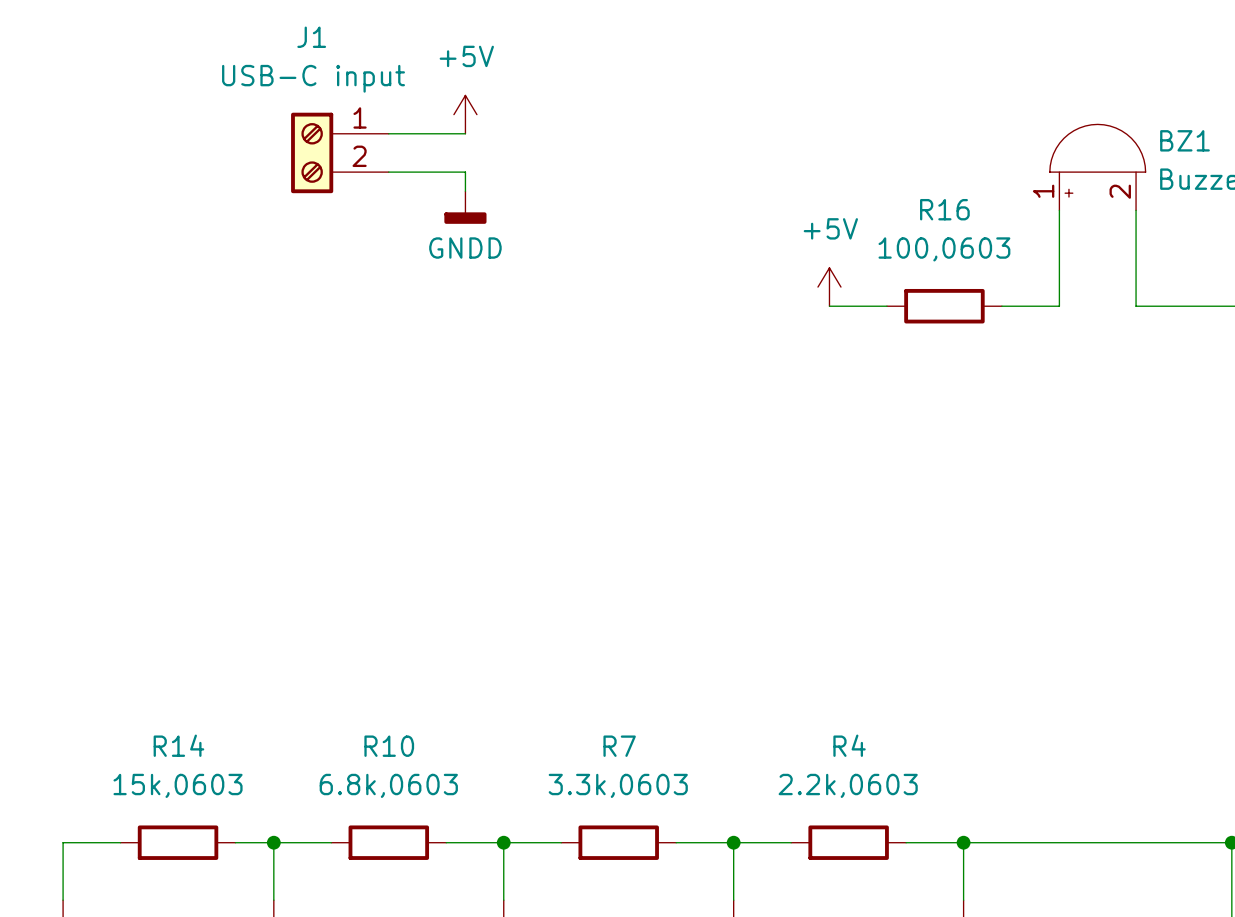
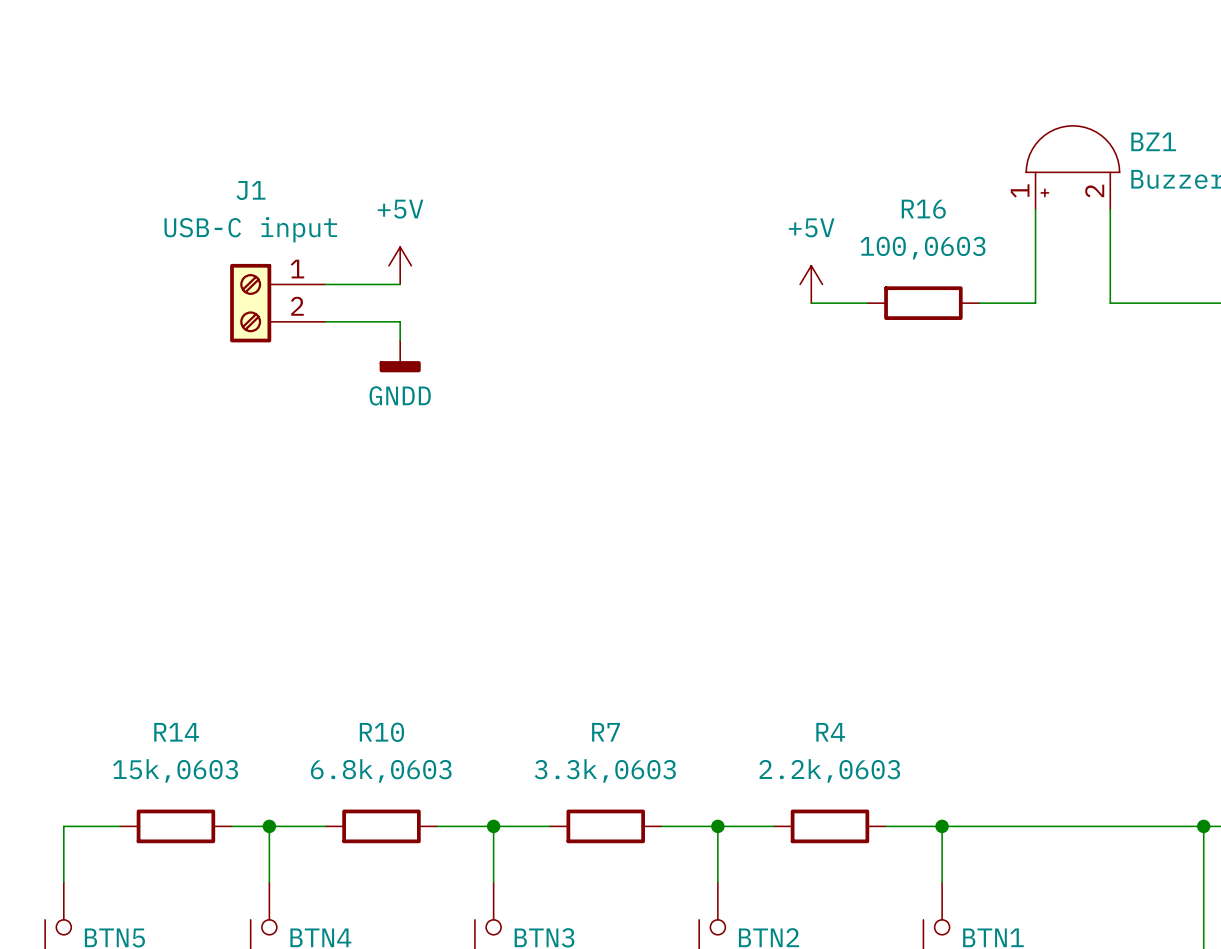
power symbol position: +5V (465, 114) -> +5V (400, 265)
wire: (388, 133) (465, 133) -> (325, 284) (400, 284)
J1 position: (339, 152) -> (277, 303)
wire: (388, 172) (465, 172) (465, 191) -> (325, 321) (400, 321) (400, 340)
power symbol position: GNDD (465, 207) -> GNDD (400, 356)

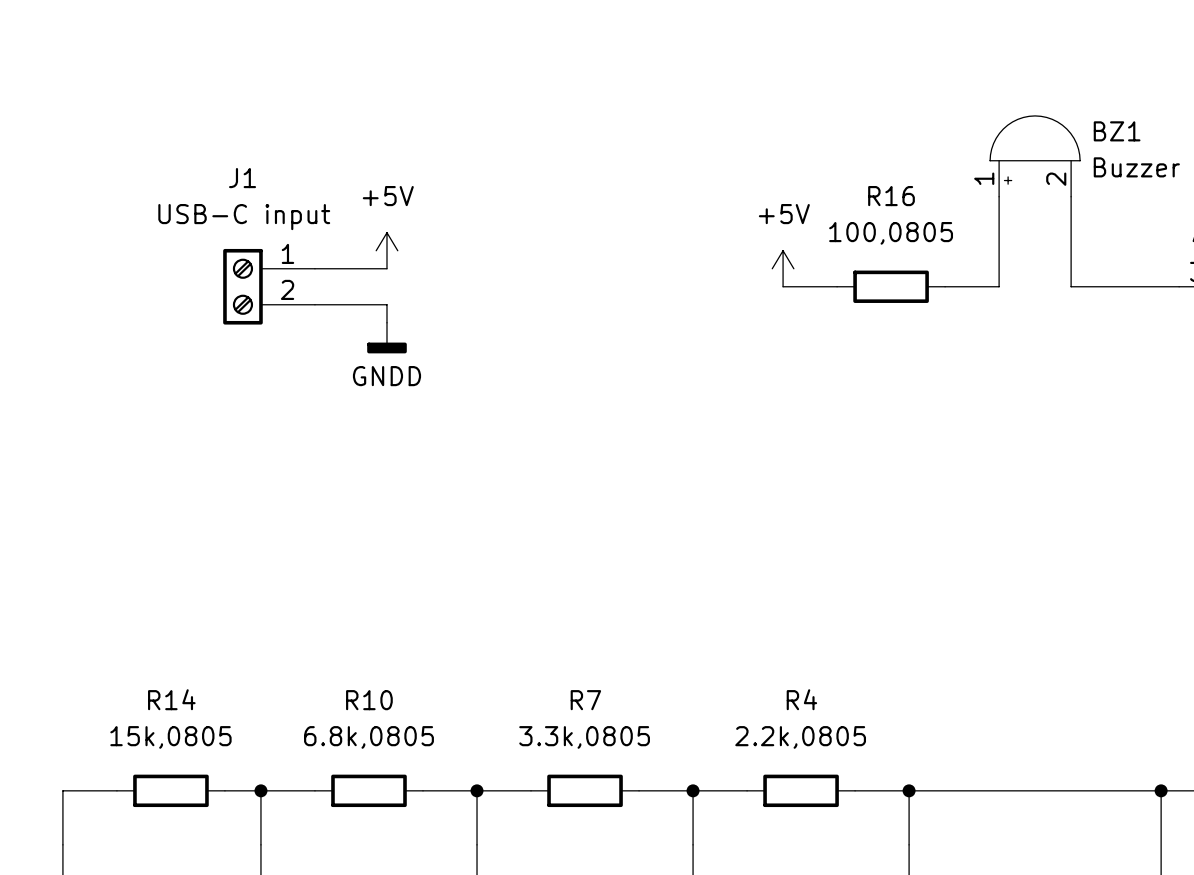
R16 value: 100,0603 (923, 248) -> 100,0805 (891, 233)
R14 value: 15k,0603 (175, 770) -> 15k,0805 (170, 737)
R10 value: 6.8k,0603 (381, 770) -> 6.8k,0805 (368, 737)
R7 value: 3.3k,0603 (605, 770) -> 3.3k,0805 (584, 737)
R4 value: 2.2k,0603 (829, 770) -> 2.2k,0805 (800, 737)

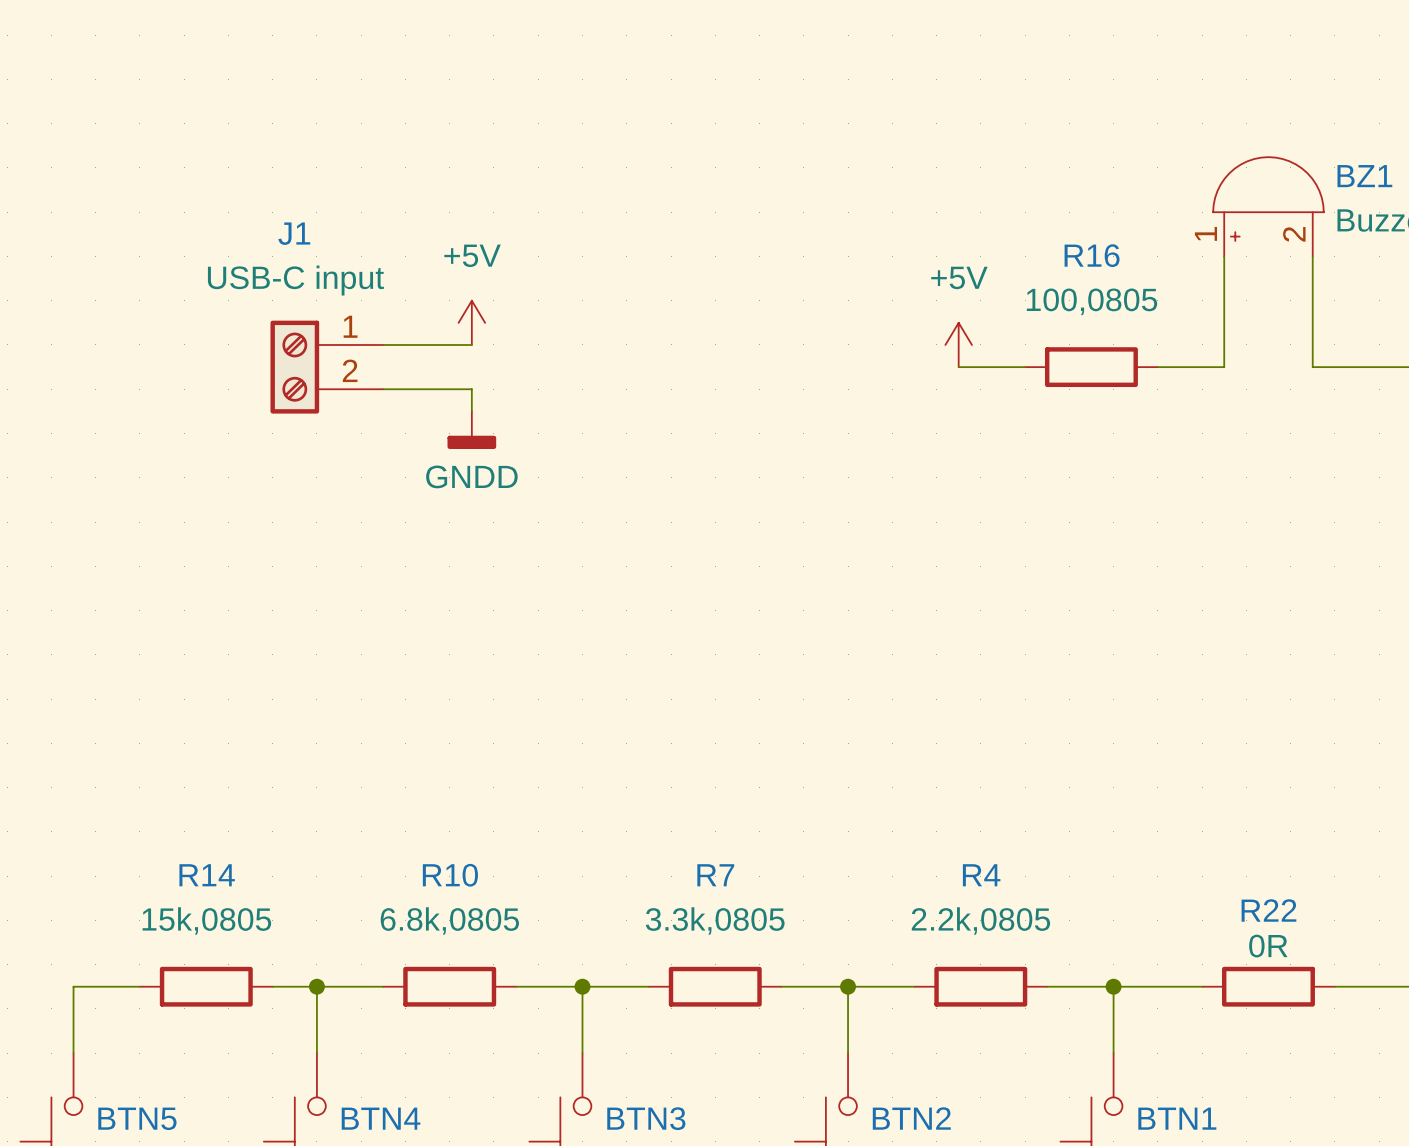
wire: (981, 790) (1089, 790) -> none
R22: none -> 0R (1268, 986)

